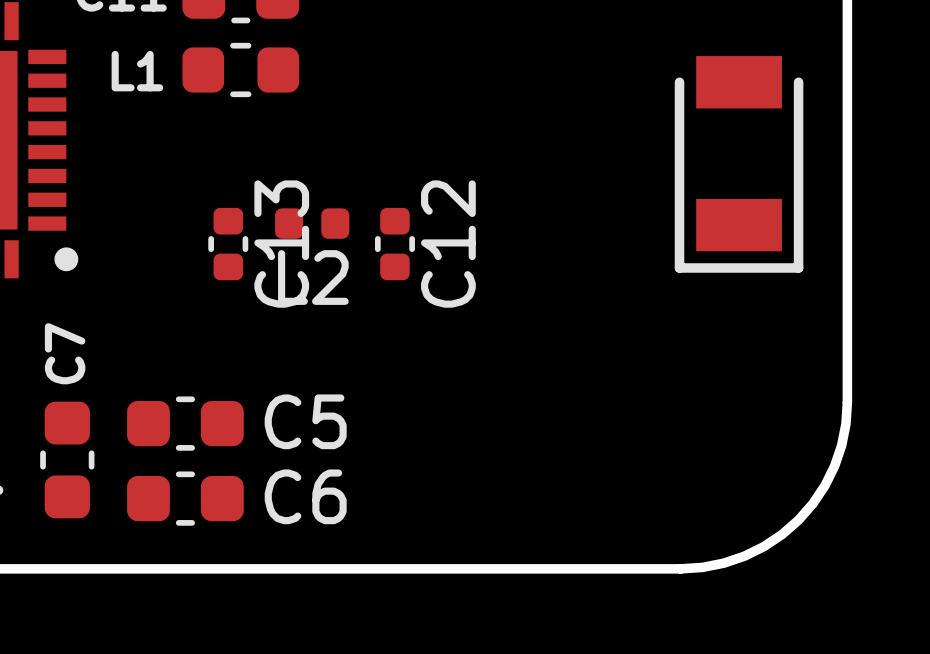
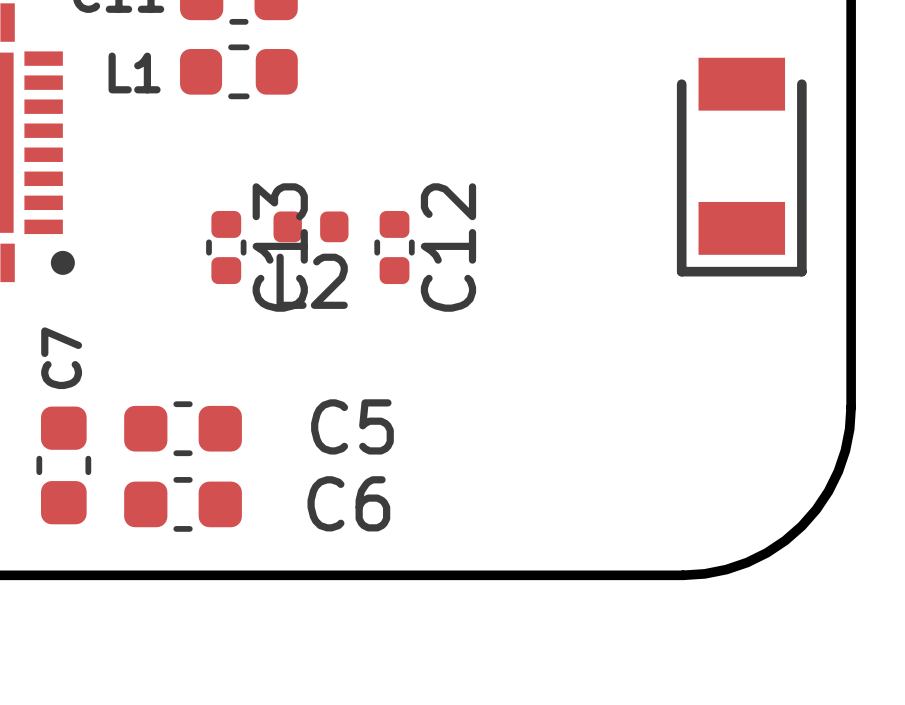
C5 name position: C5 (305, 421) -> C5 (352, 426)
C6 name position: C6 (305, 496) -> C6 (348, 503)

